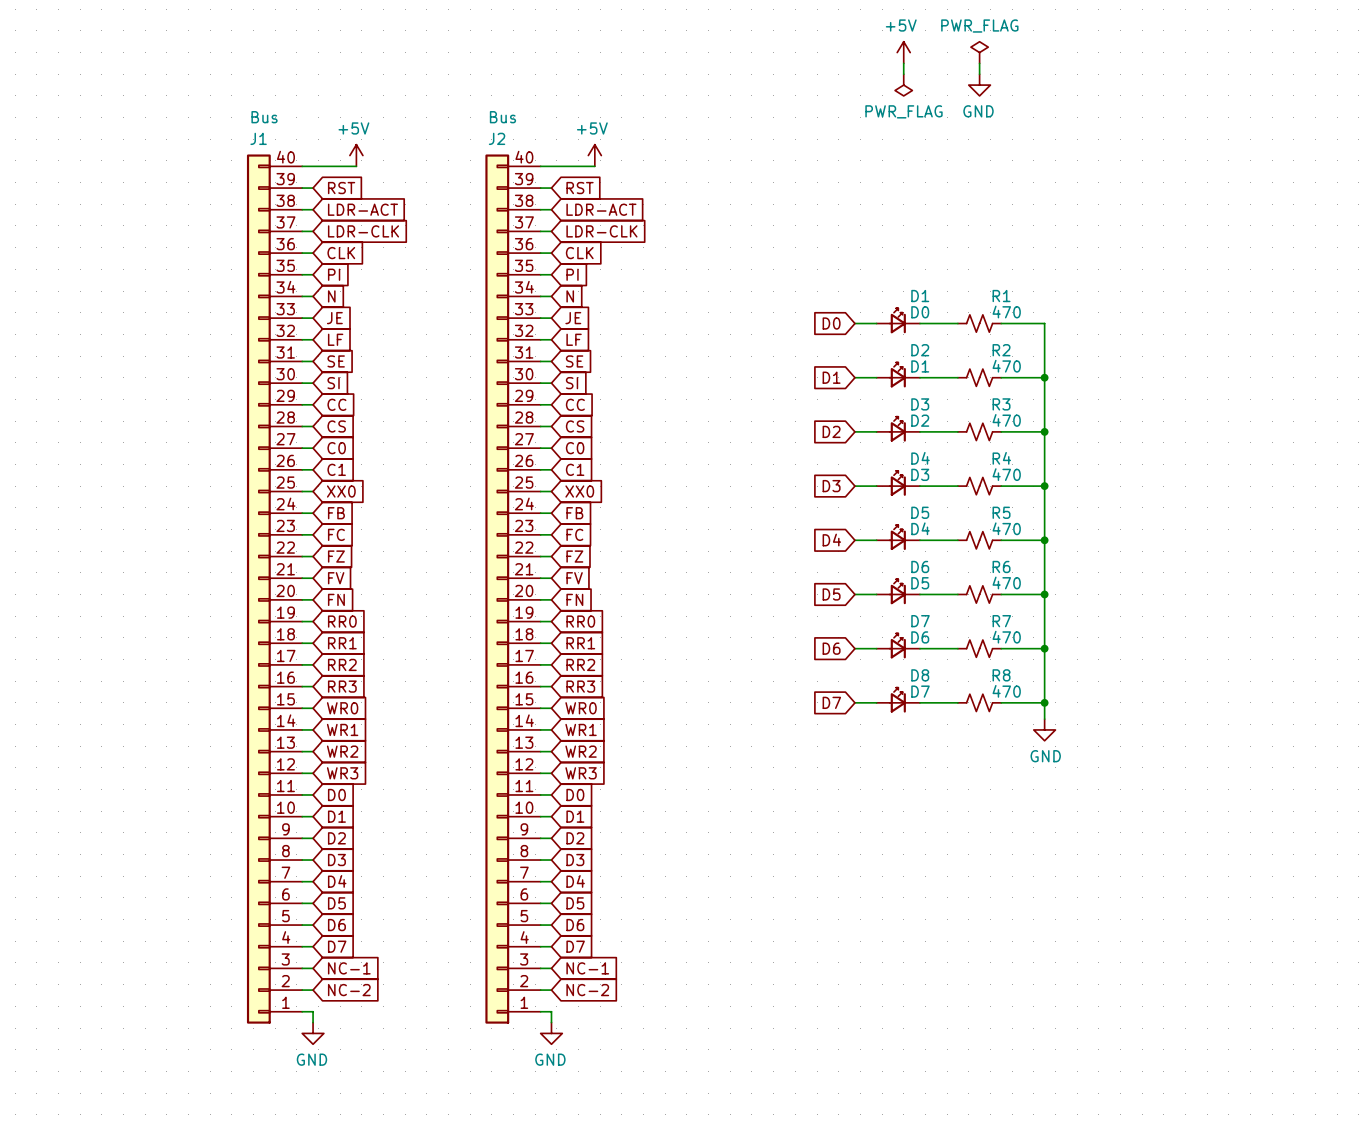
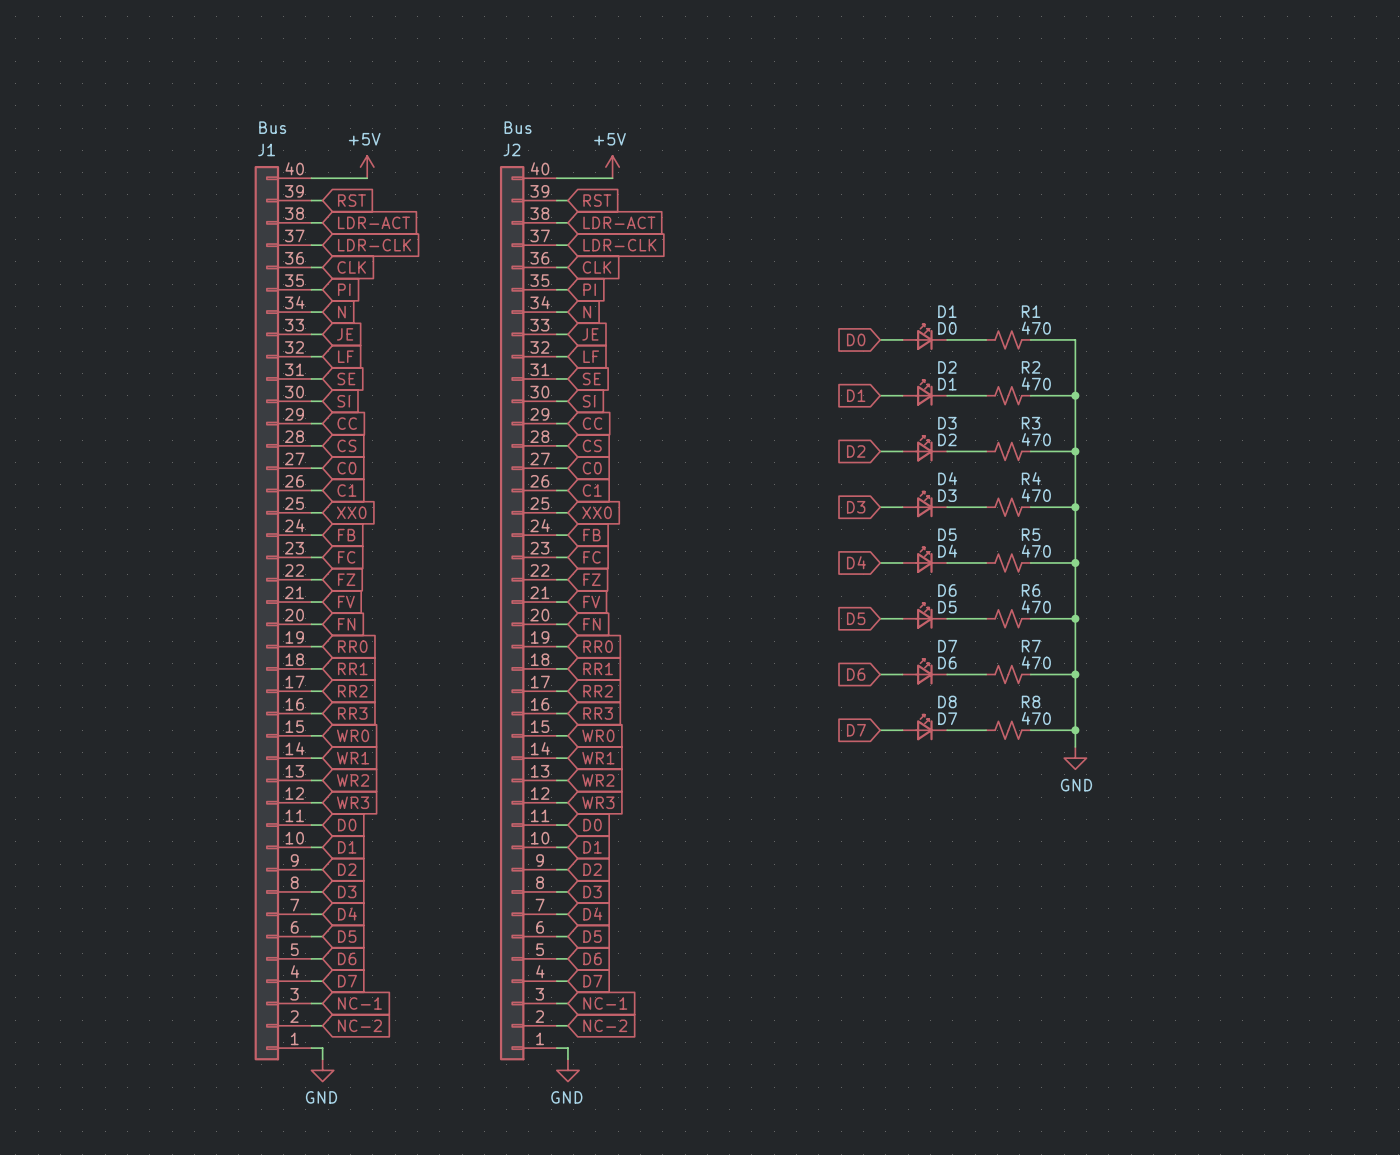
power symbol: +5V (903, 52) -> none
power symbol: PWR_FLAG (979, 52) -> none
wire: (903, 63) (903, 74) -> none
wire: (979, 63) (979, 74) -> none
power symbol: PWR_FLAG (903, 85) -> none
power symbol: GND (979, 85) -> none

